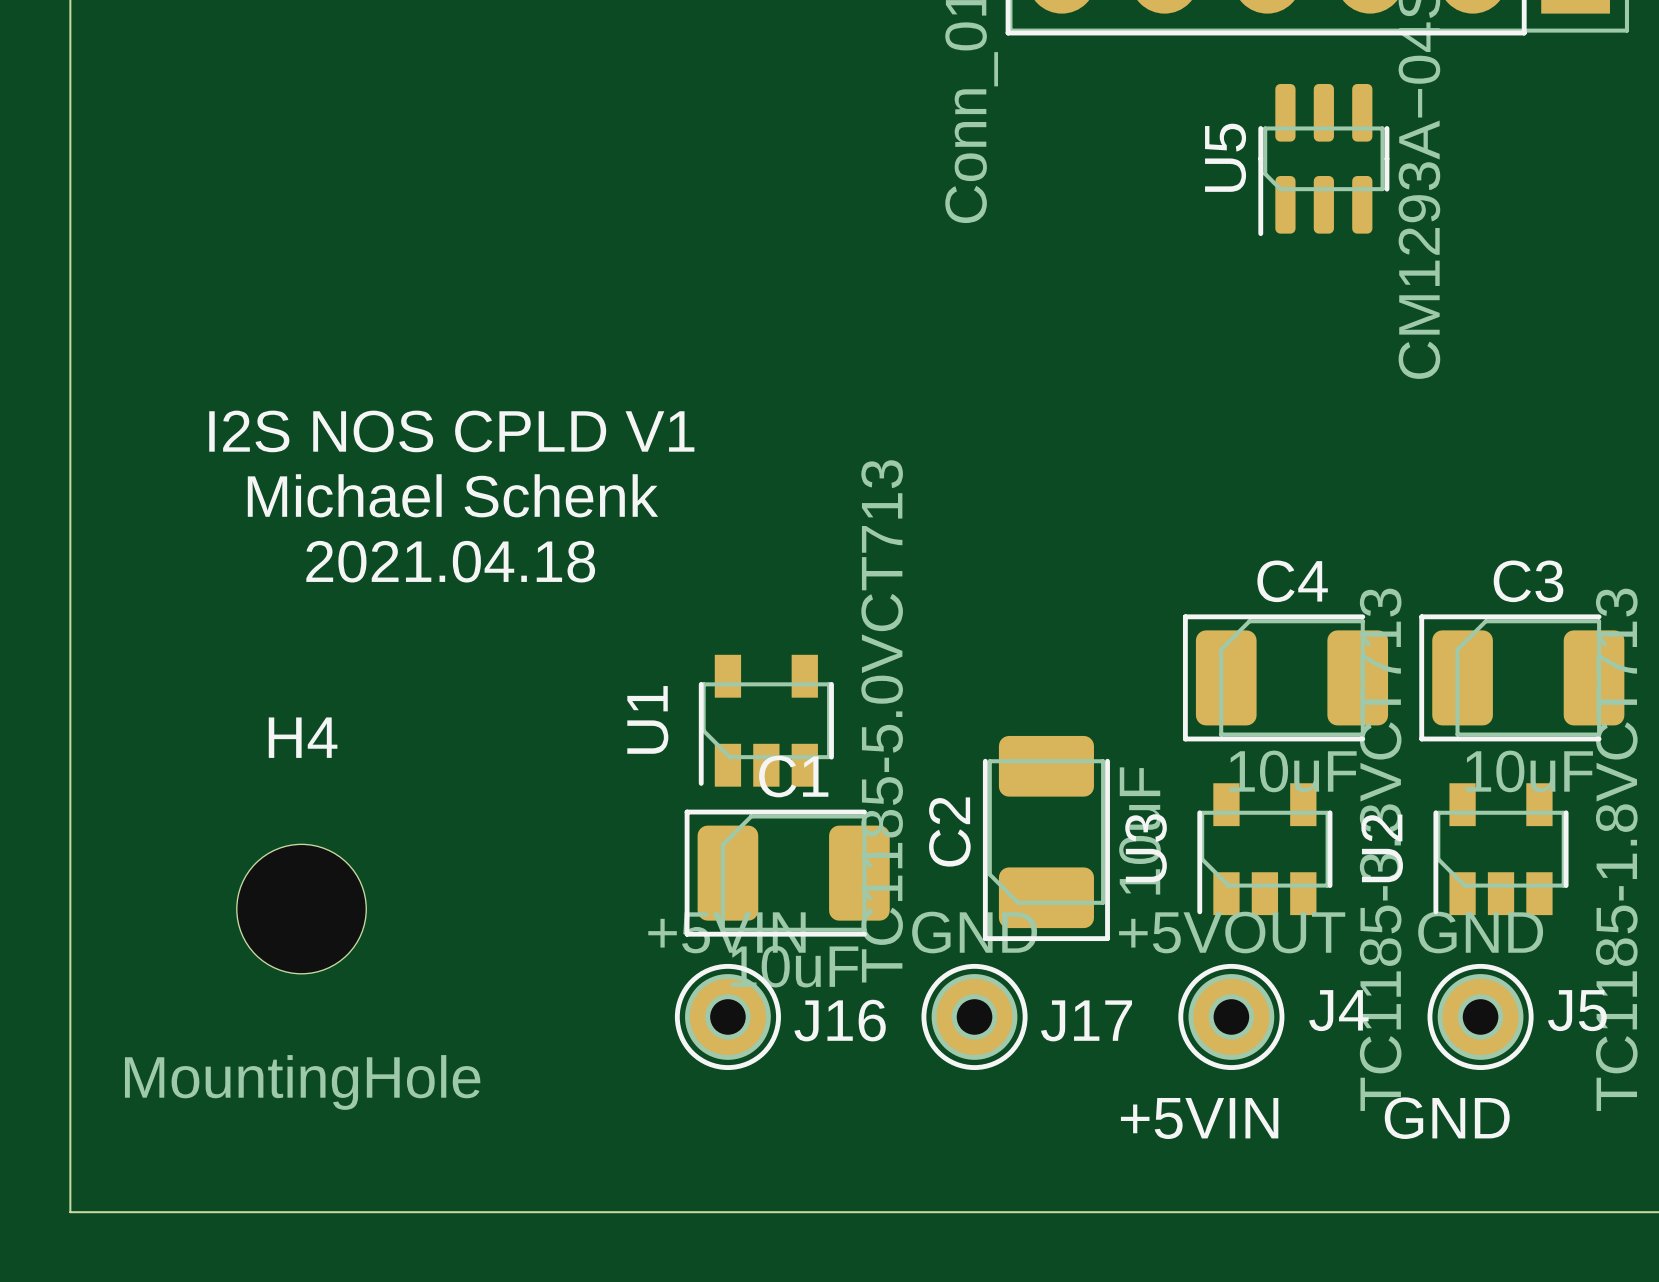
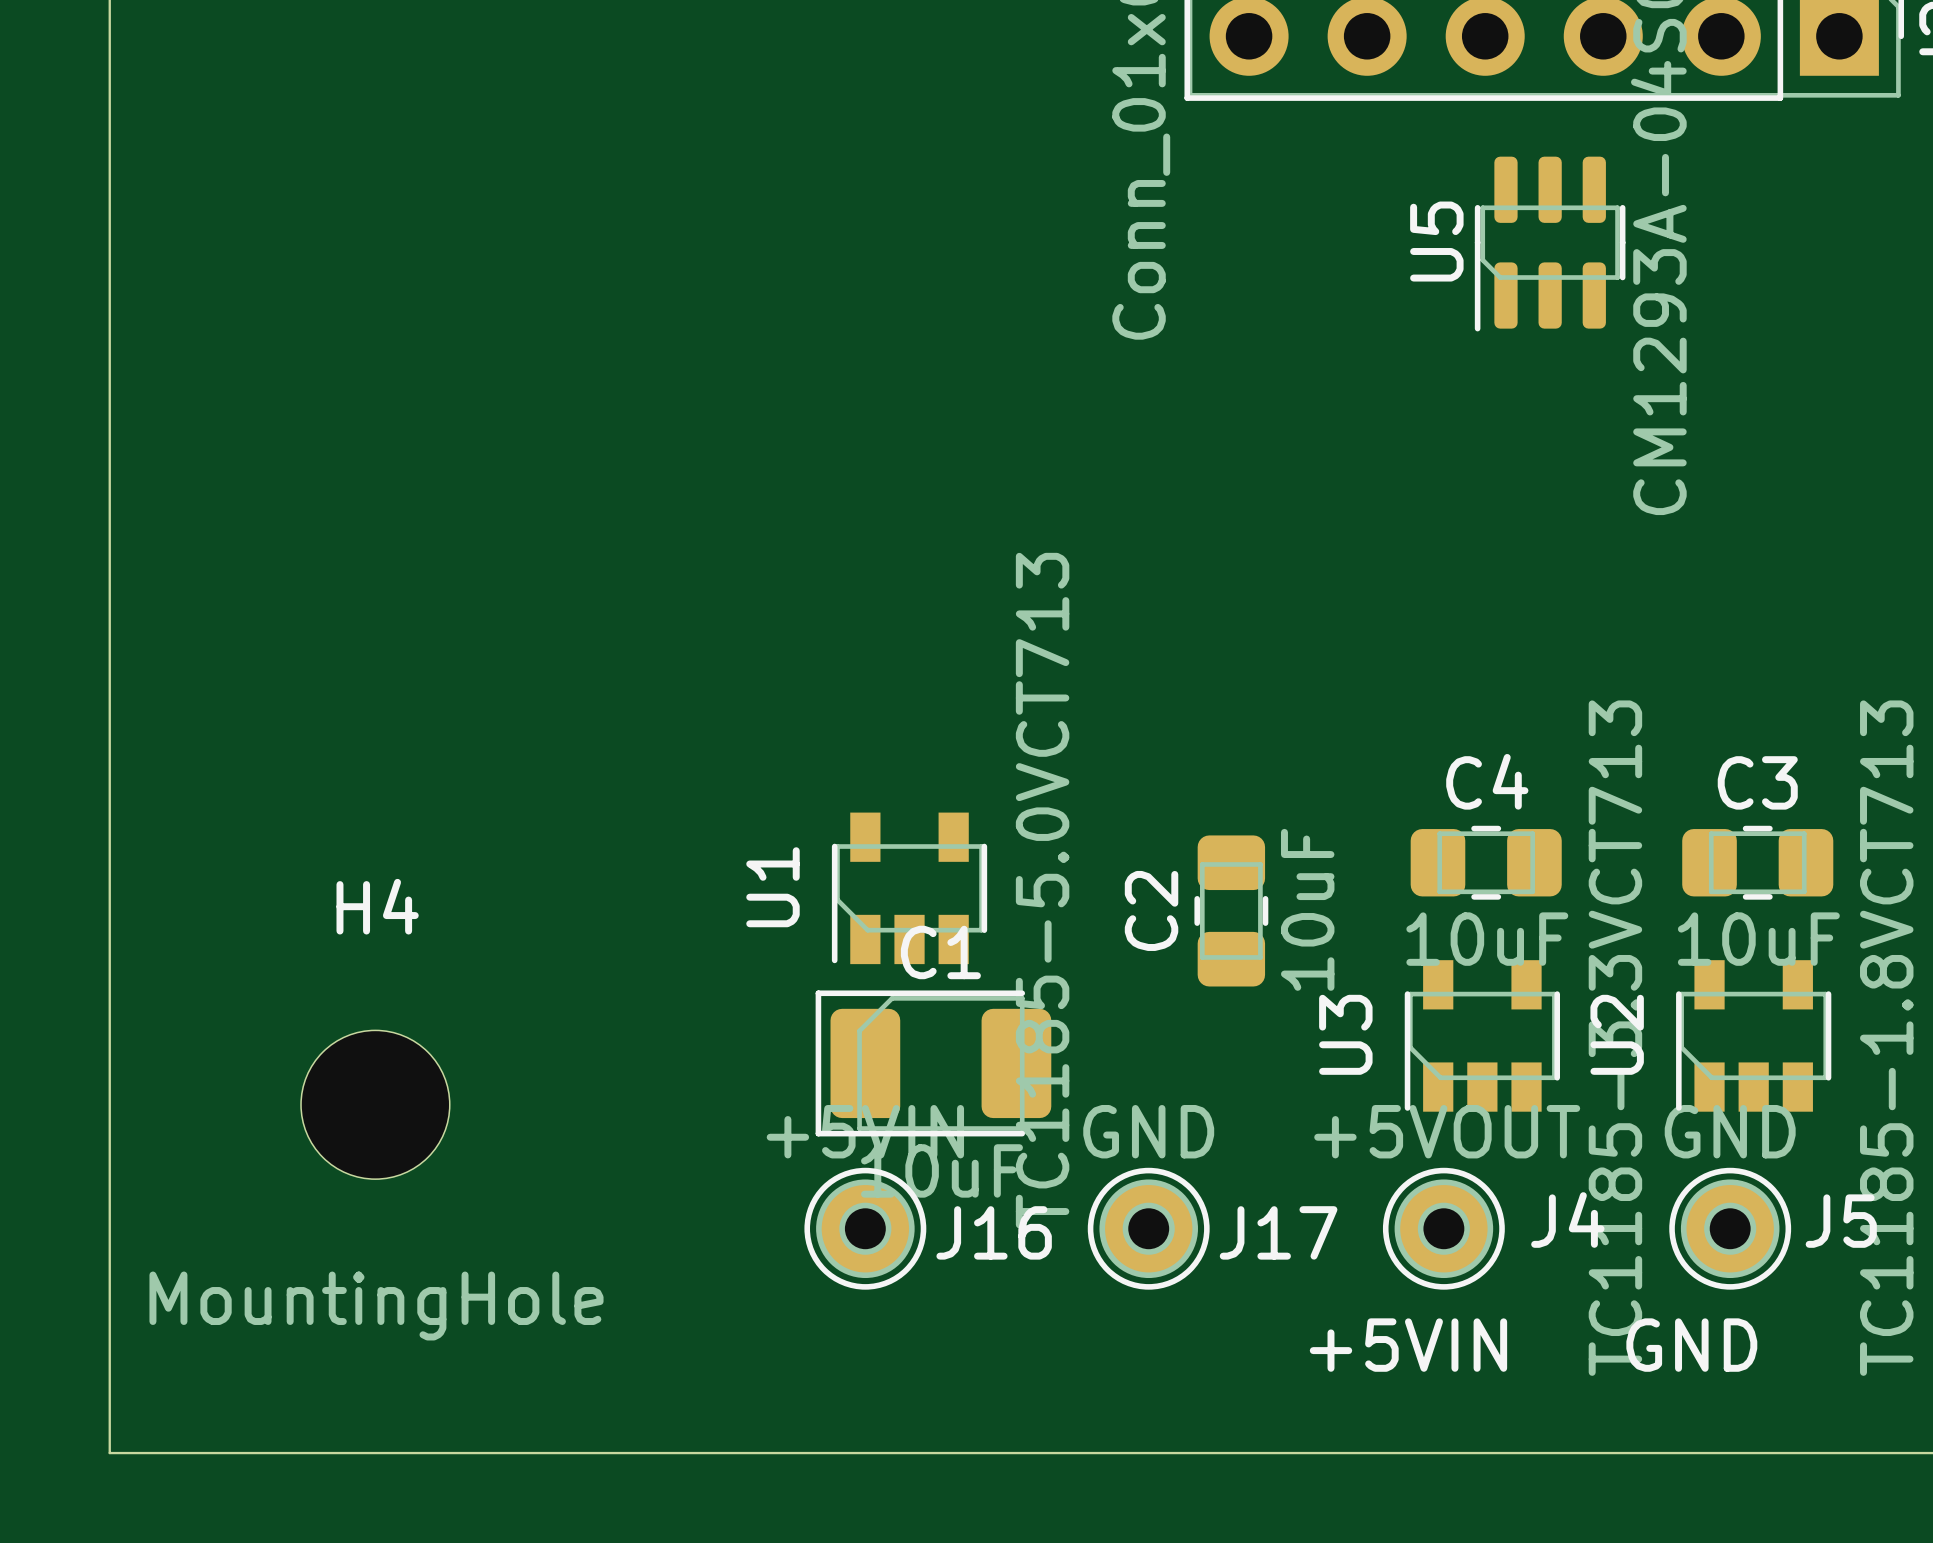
text: I2S NOS CPLD V1 (451, 431) -> none
text: Michael Schenk (452, 495) -> none
text: 2021.04.18 (450, 561) -> none
C4 footprint: [1182, 614, 1389, 742] -> [1410, 825, 1562, 900]
C3 footprint: [1419, 614, 1625, 742] -> [1682, 825, 1834, 900]
C2 footprint: [982, 735, 1110, 942] -> [1194, 835, 1269, 987]

